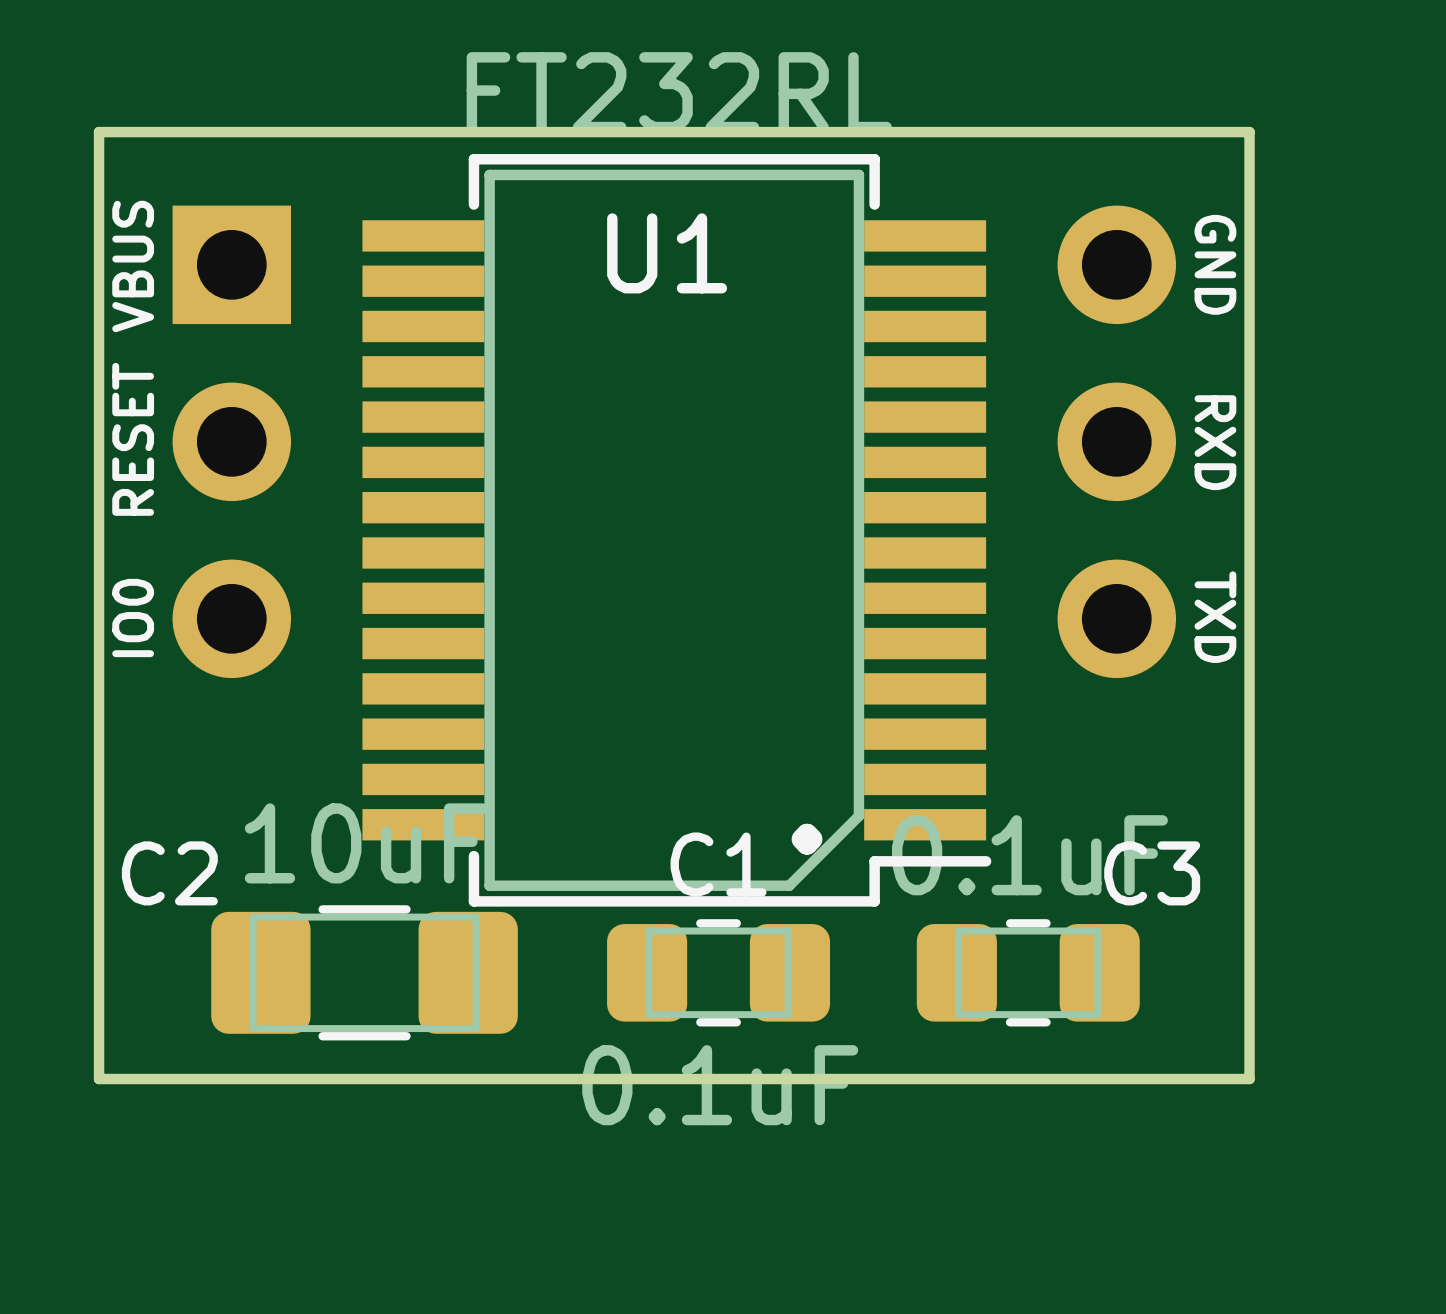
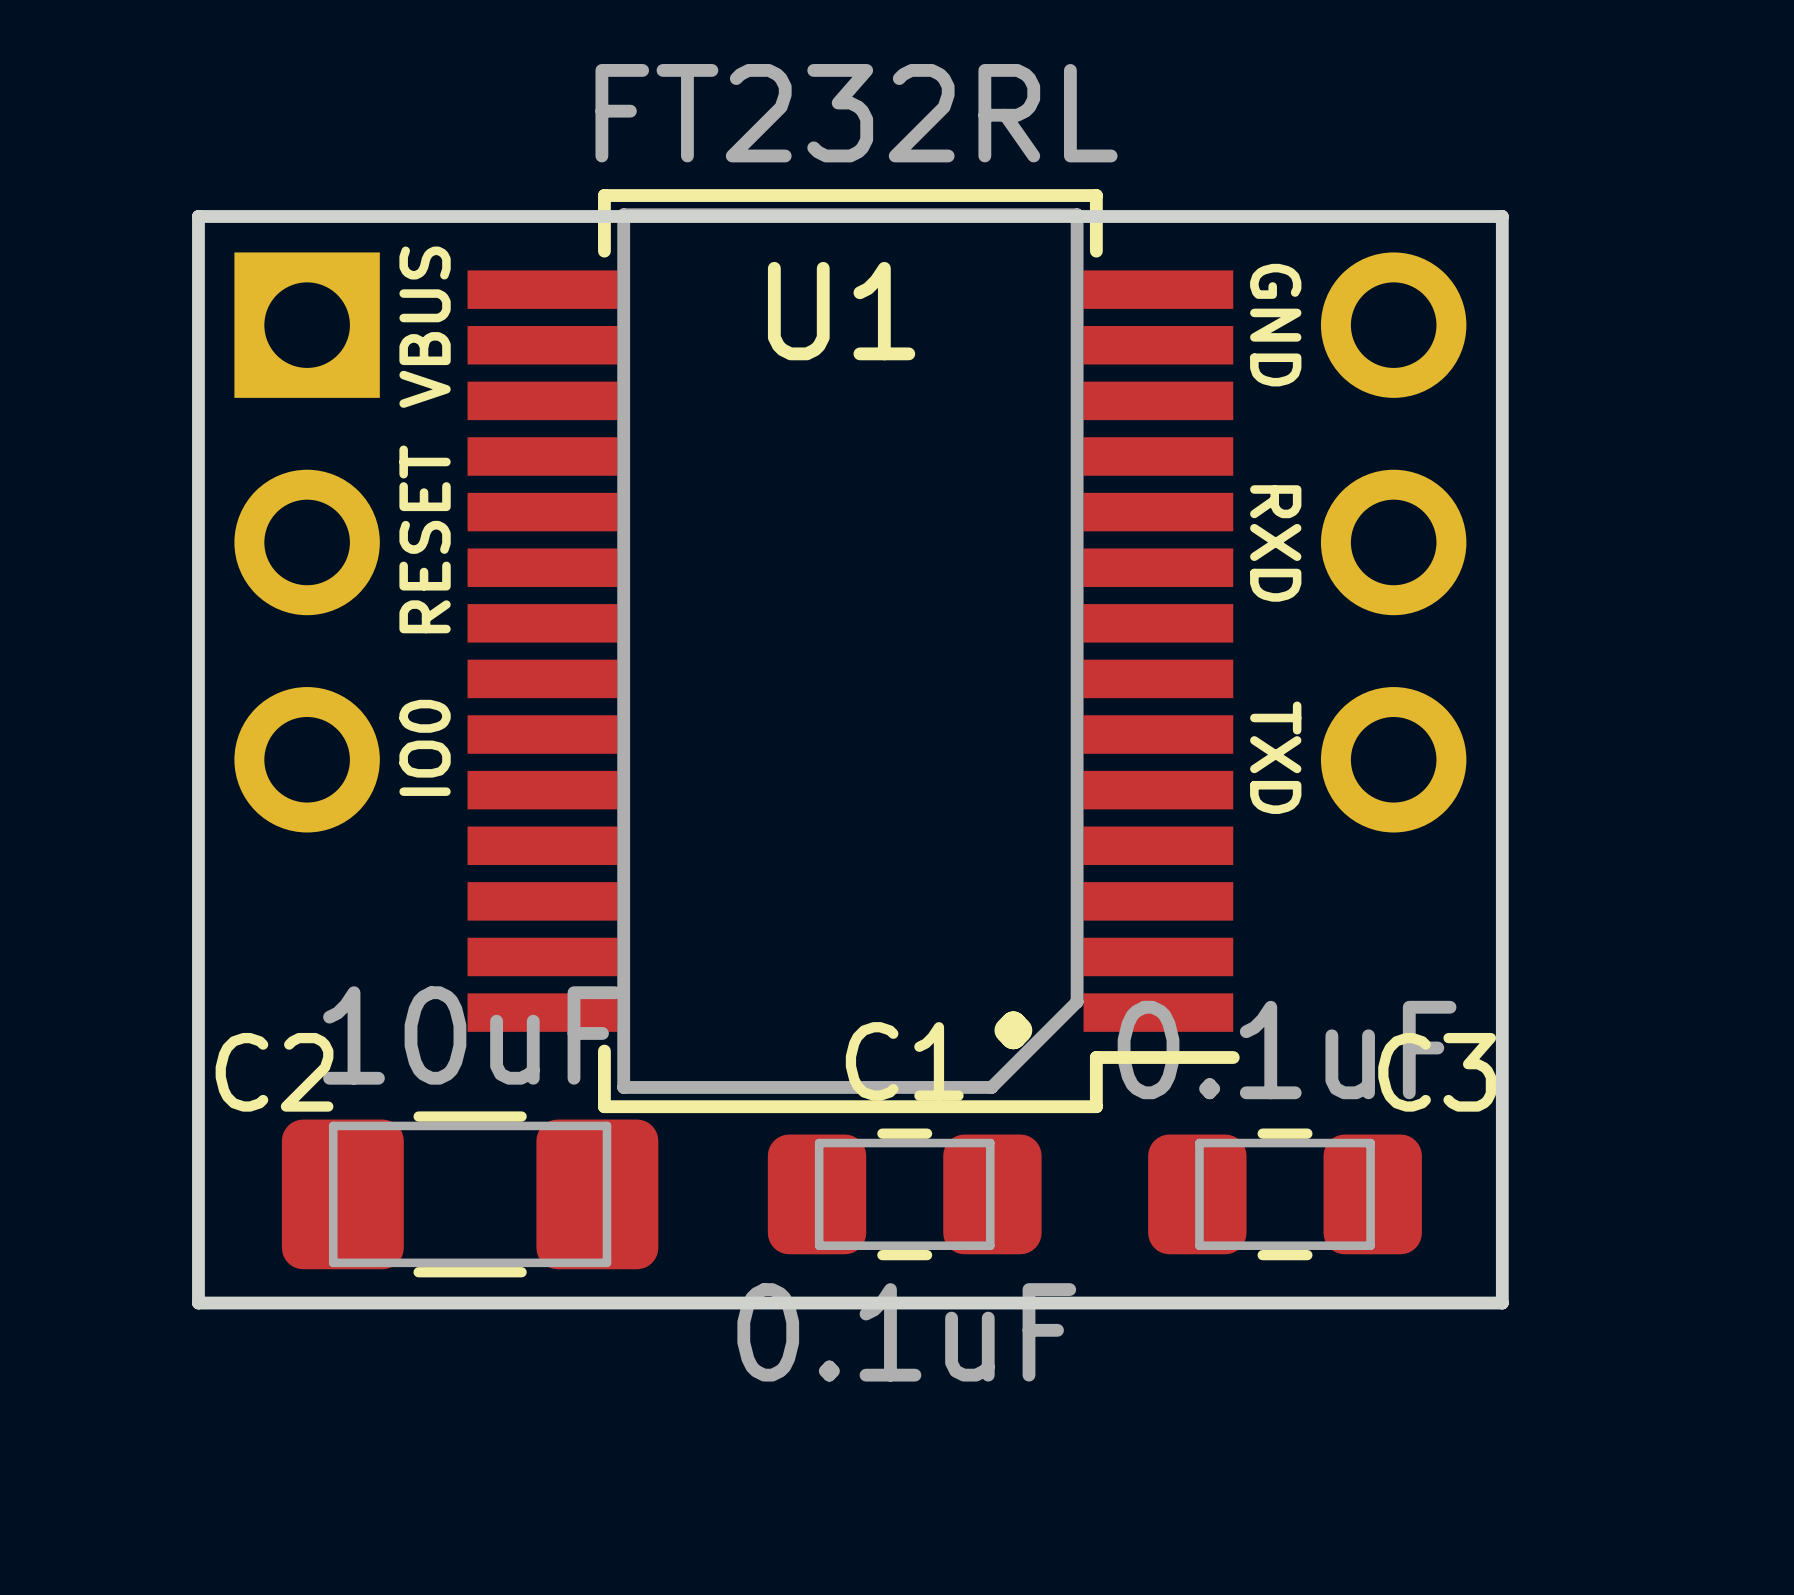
board edge: (99, 132) (99, 1079) (1249, 1079) (1249, 132) (99, 132) -> (198, 216) (198, 1303) (1502, 1303) (1502, 216) (198, 216)
text position: GND (1215, 264) -> GND (1275, 325)
text position: VBUS (133, 266) -> VBUS (425, 327)
text position: RESET (133, 439) -> RESET (425, 539)
text position: RXD (1215, 442) -> RXD (1275, 543)
text position: IO0 (133, 617) -> IO0 (425, 747)
text position: TXD (1215, 617) -> TXD (1275, 757)
C2 name position: C2 (169, 873) -> C2 (274, 1072)

